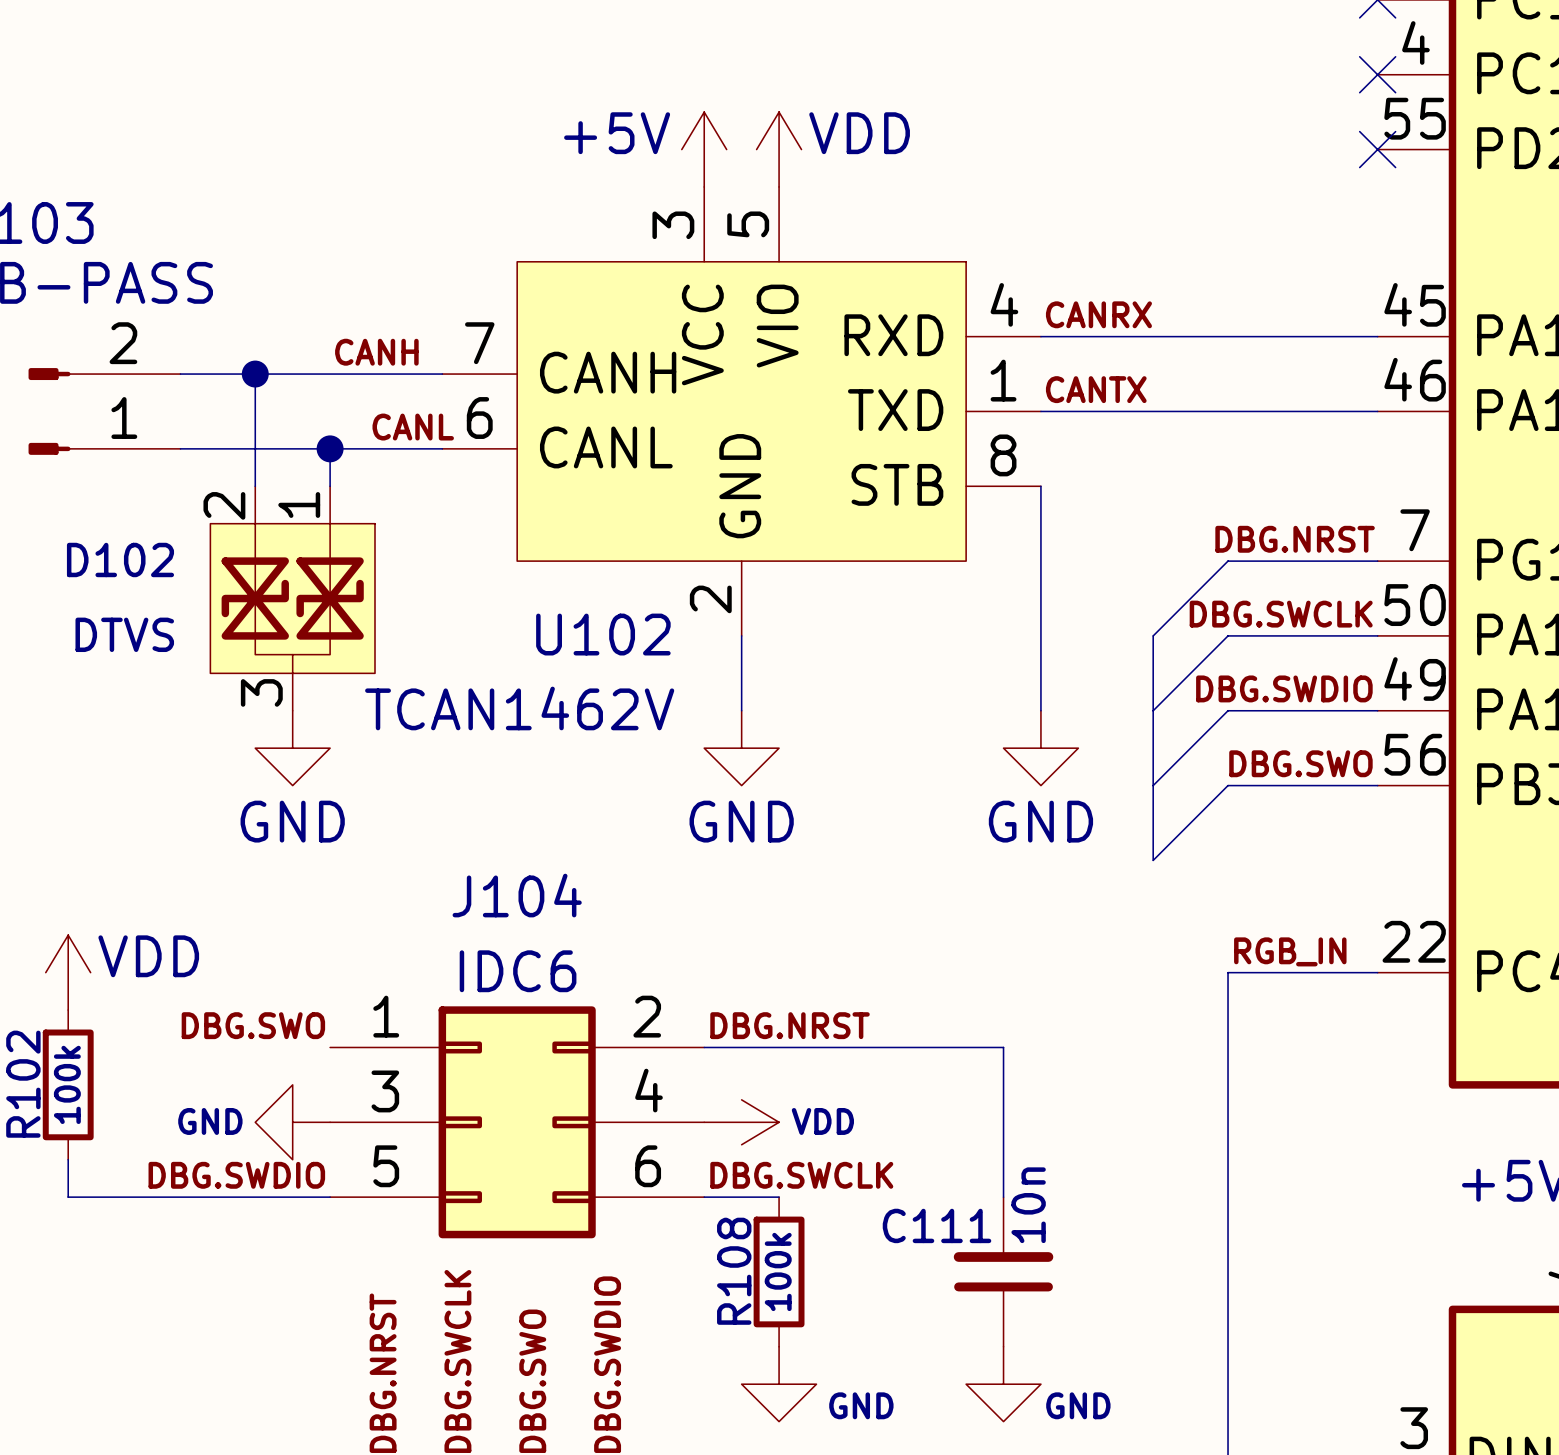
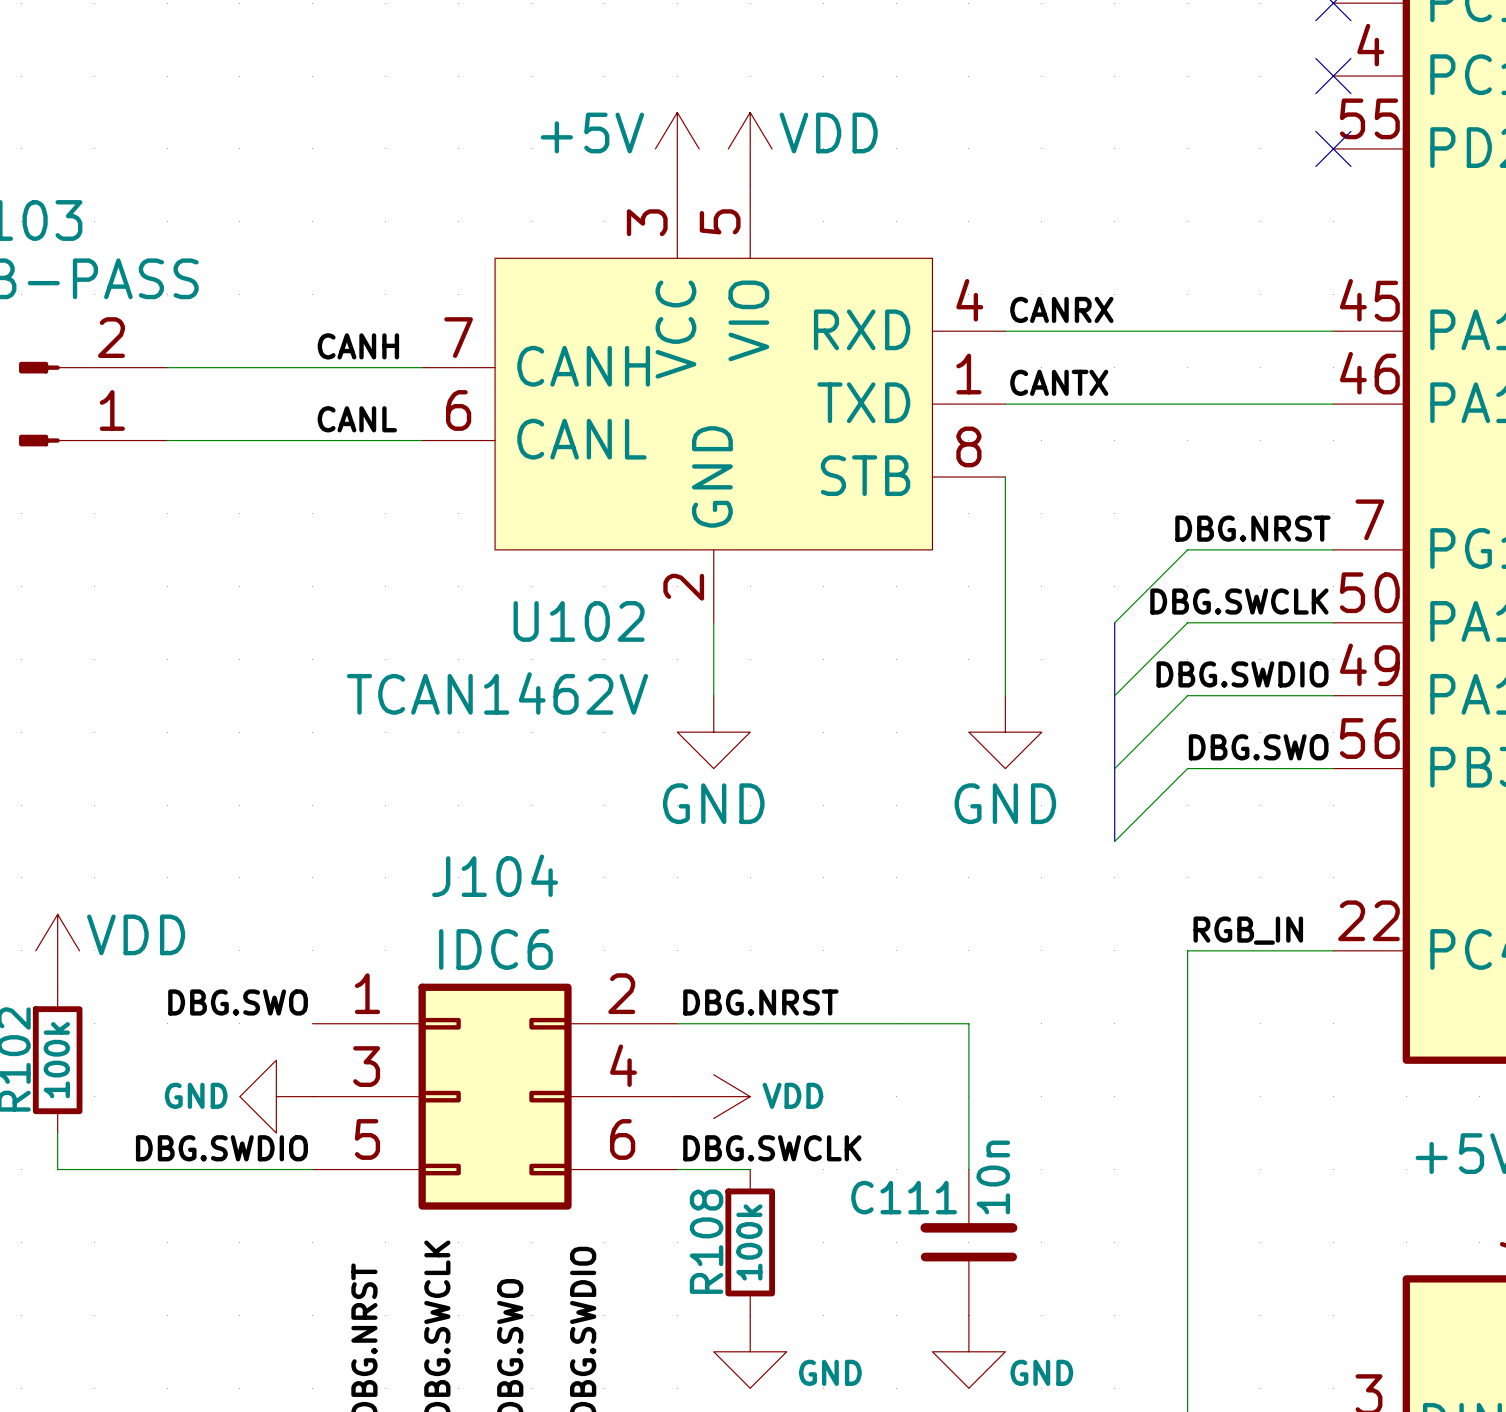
wire: (255, 374) (255, 486) -> none
junction: (255, 374) -> none
label position: CANL (413, 427) -> CANL (357, 419)
wire: (330, 448) (330, 486) -> none
junction: (330, 448) -> none
D102: DTVS (292, 598) -> none
power symbol: GND (292, 748) -> none

